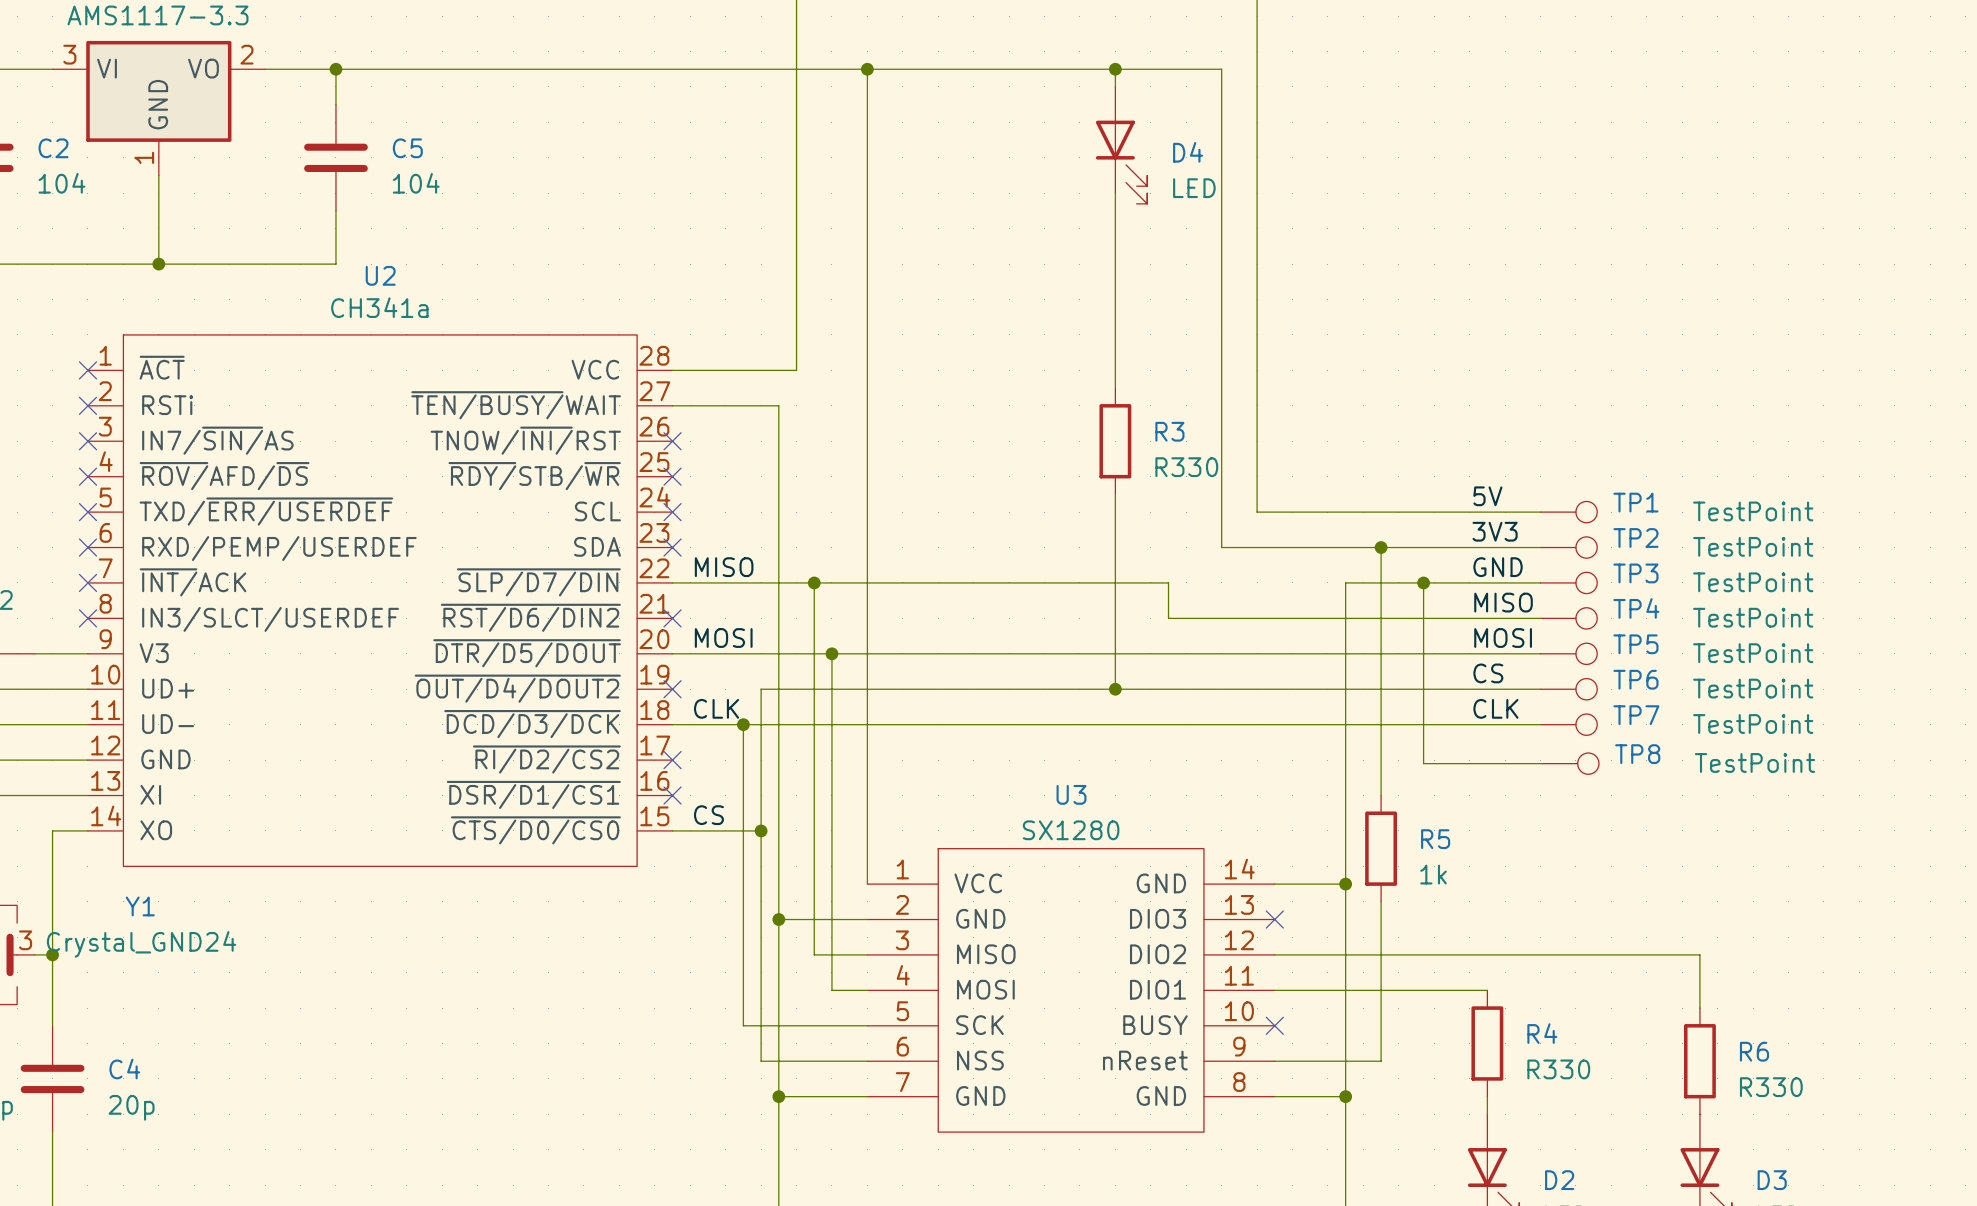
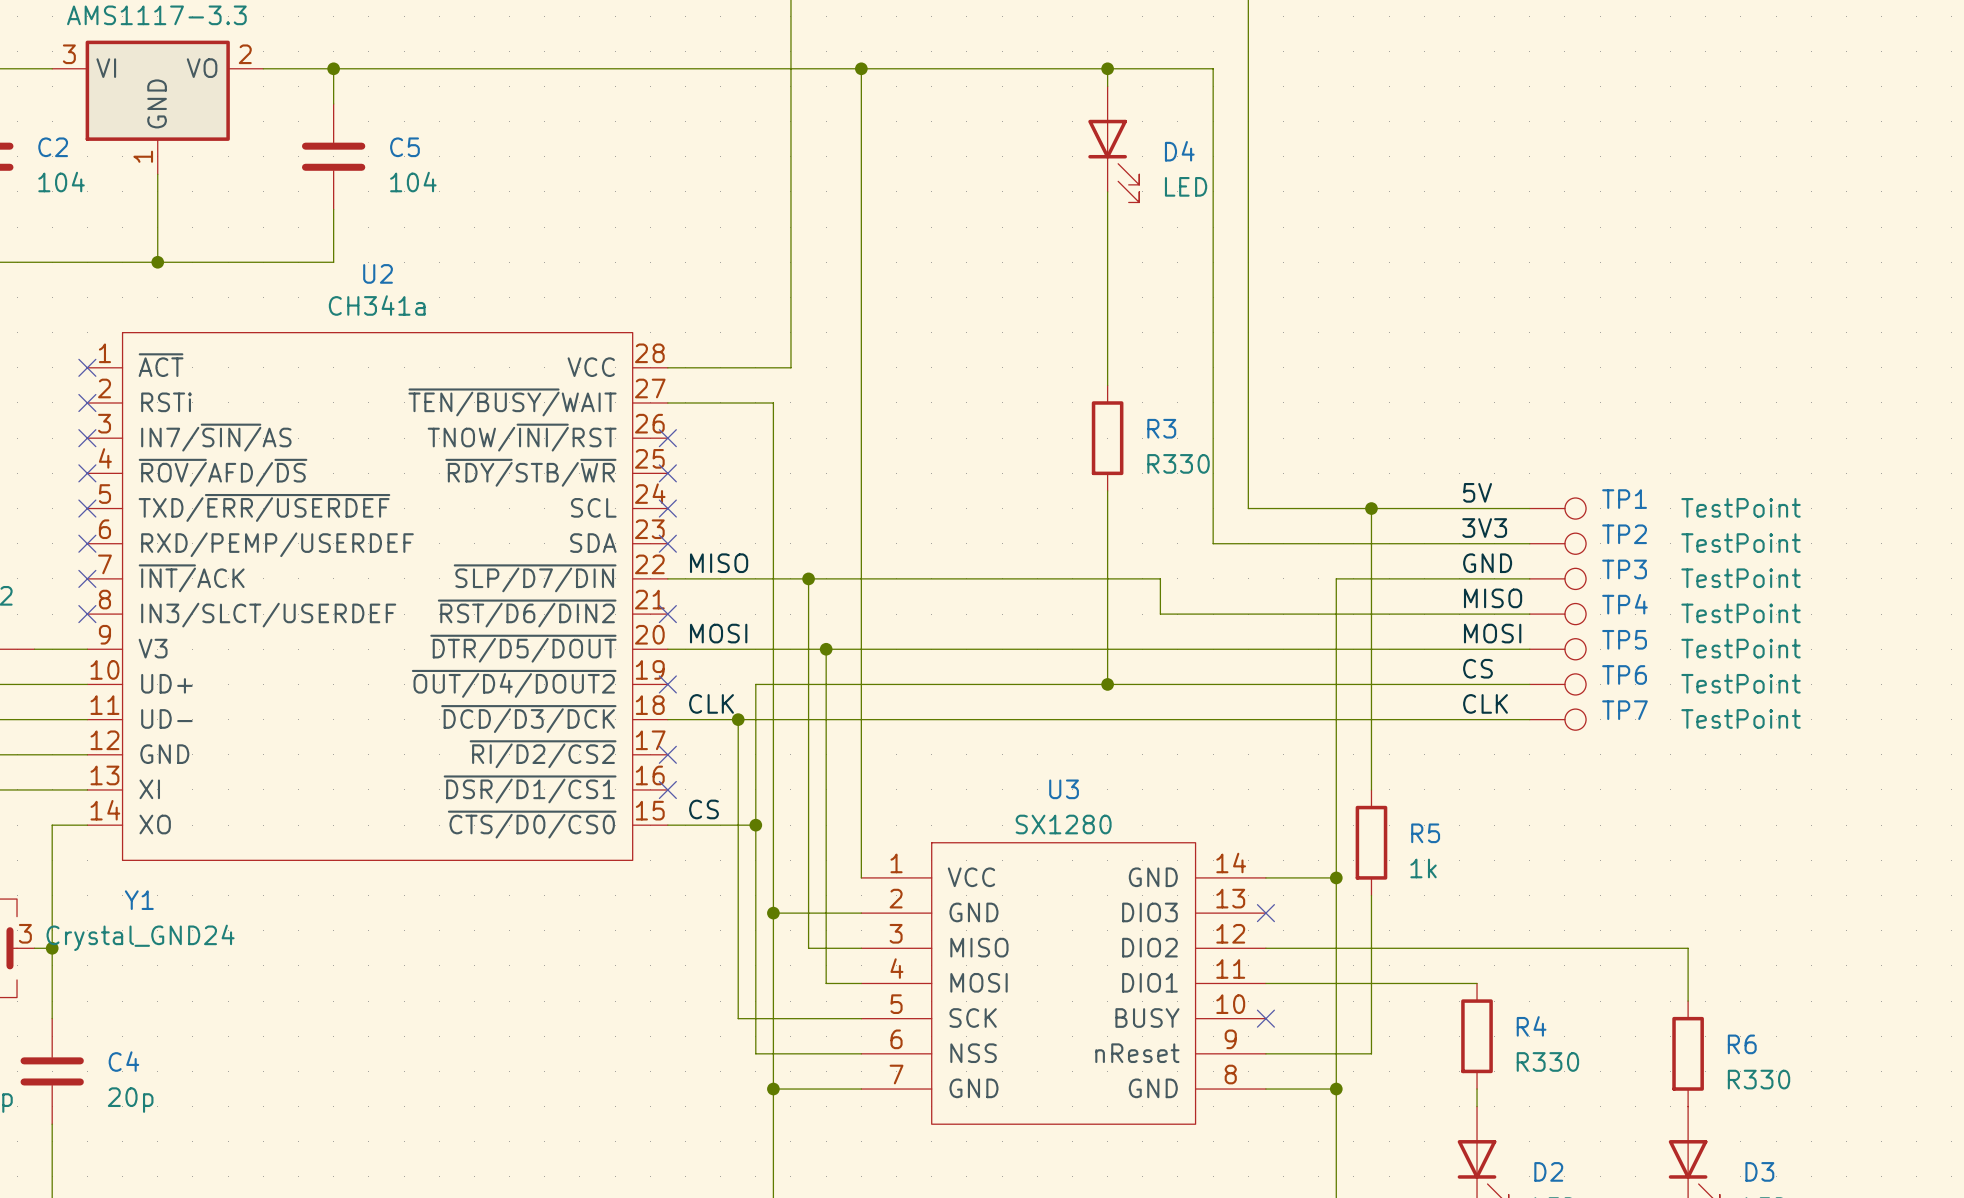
wire: none -> (1371, 508) (1371, 543)
junction position: (1381, 547) -> (1371, 508)
wire: (1423, 582) (1423, 763) (1542, 763) -> none
junction: (1423, 582) -> none
TP8: TestPoint (1570, 763) -> none

